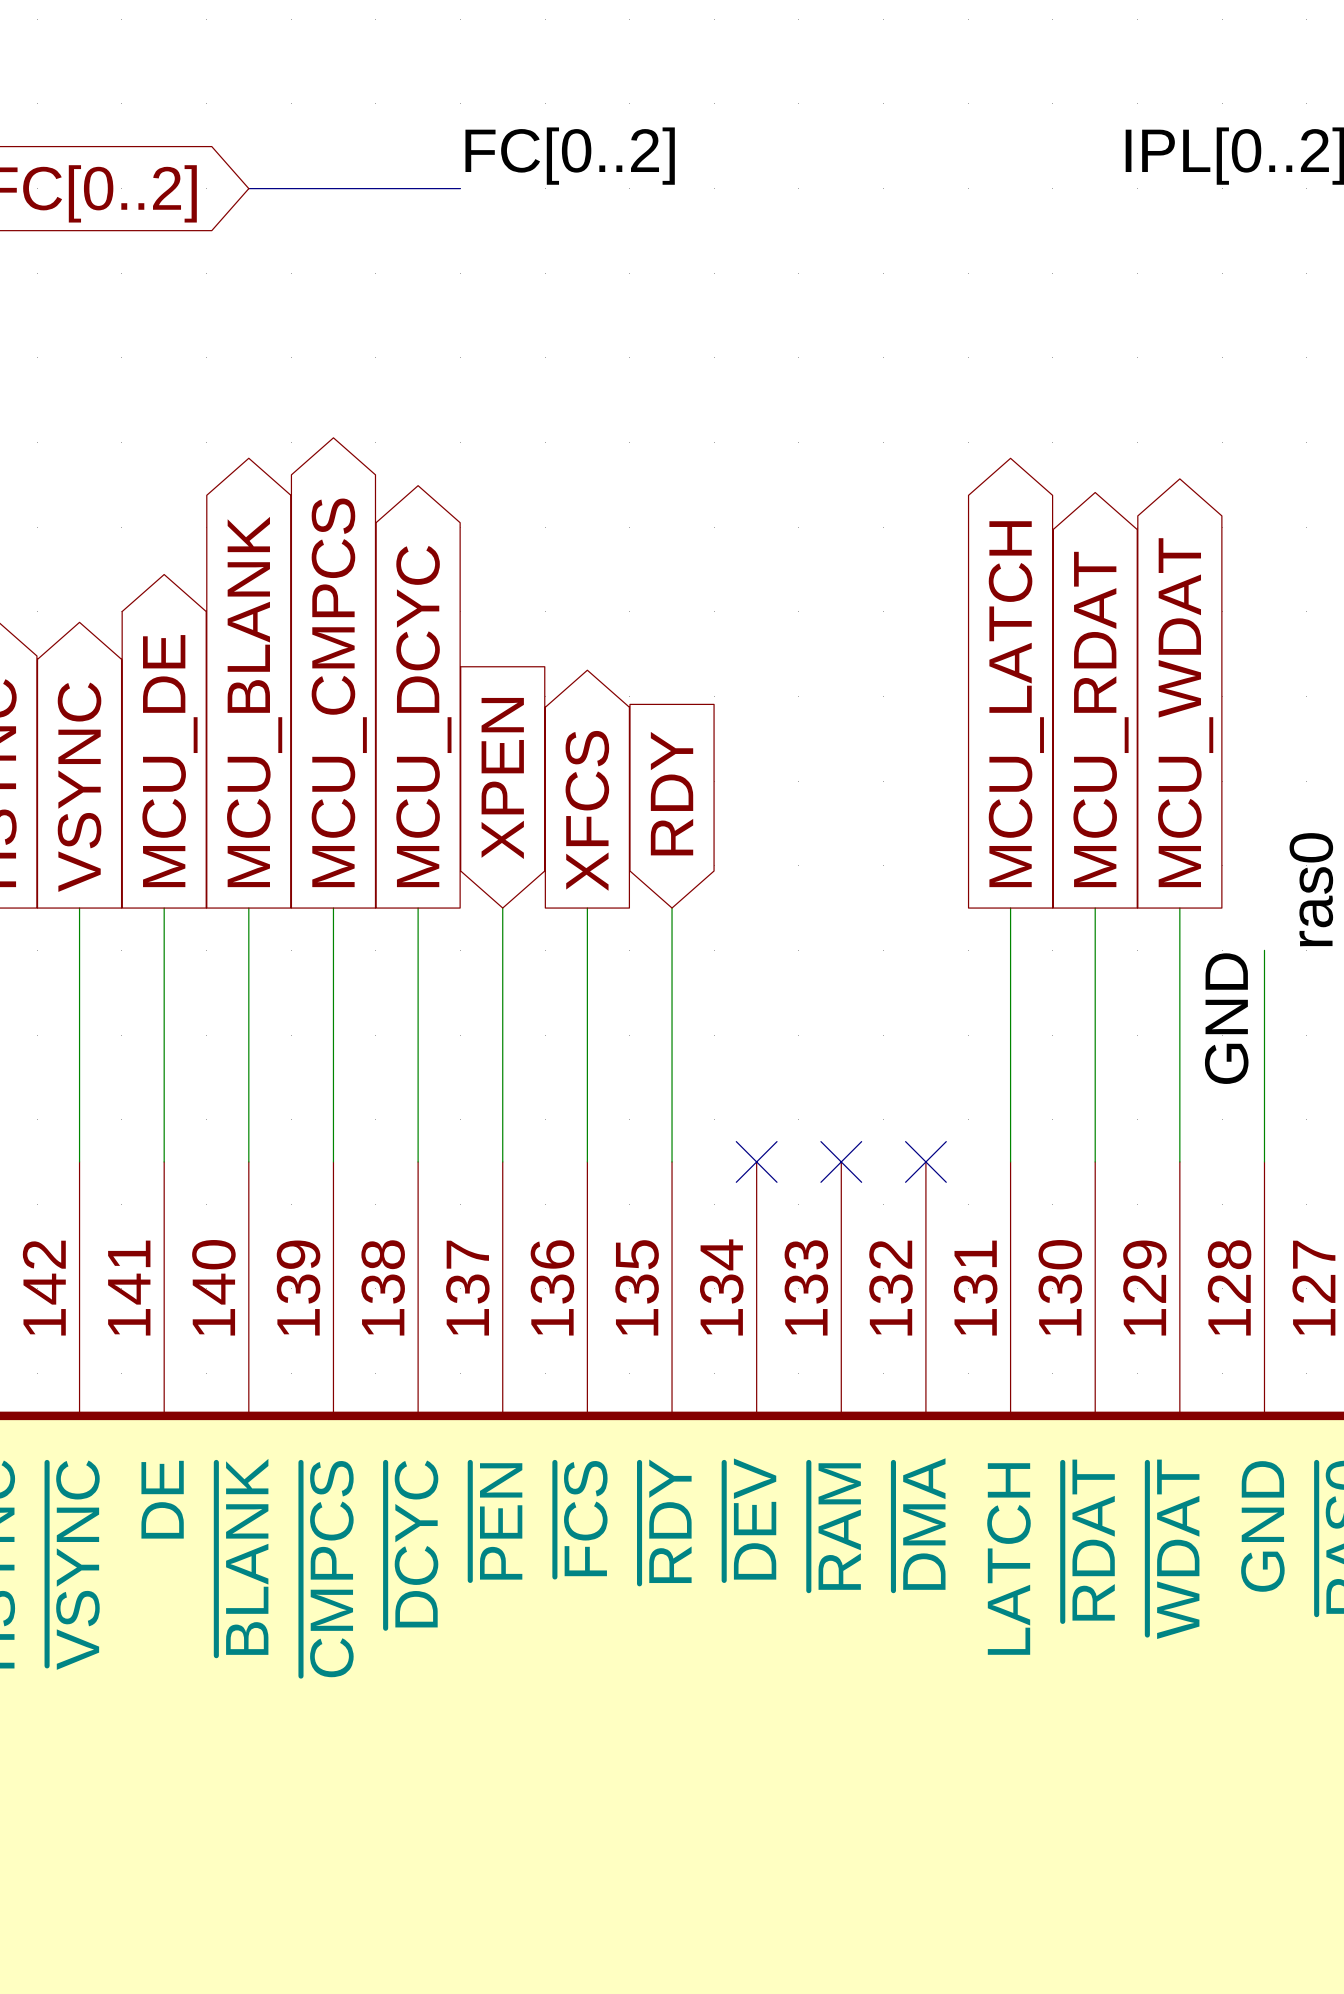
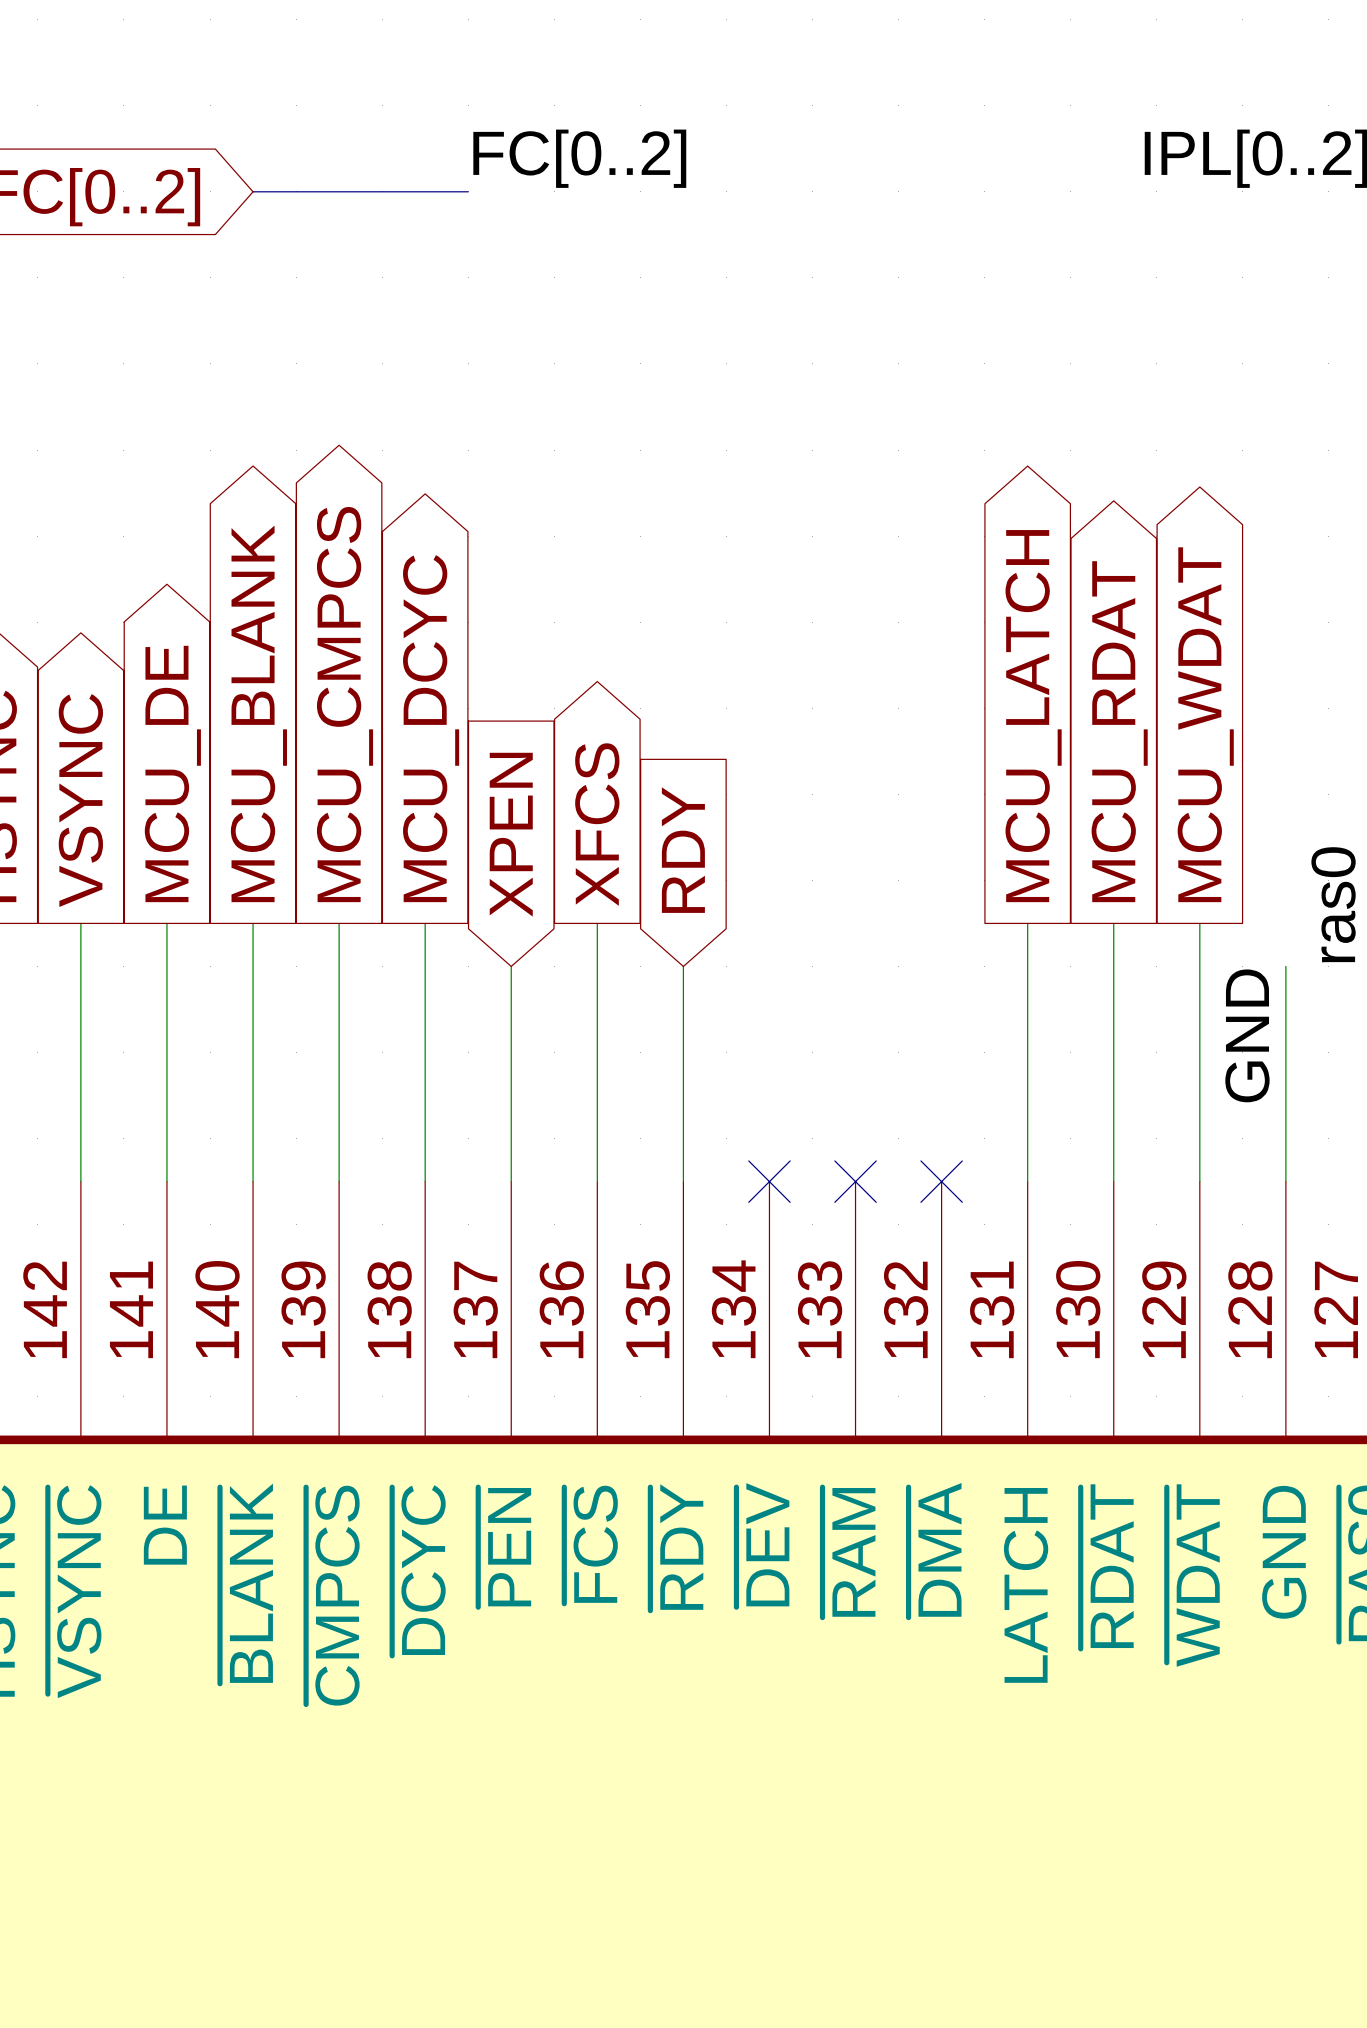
global label position: XPEN (502, 778) -> XPEN (511, 834)
global label position: RDY (672, 793) -> RDY (683, 850)
wire: (502, 908) (502, 950) -> none
wire: (672, 908) (672, 950) -> none

